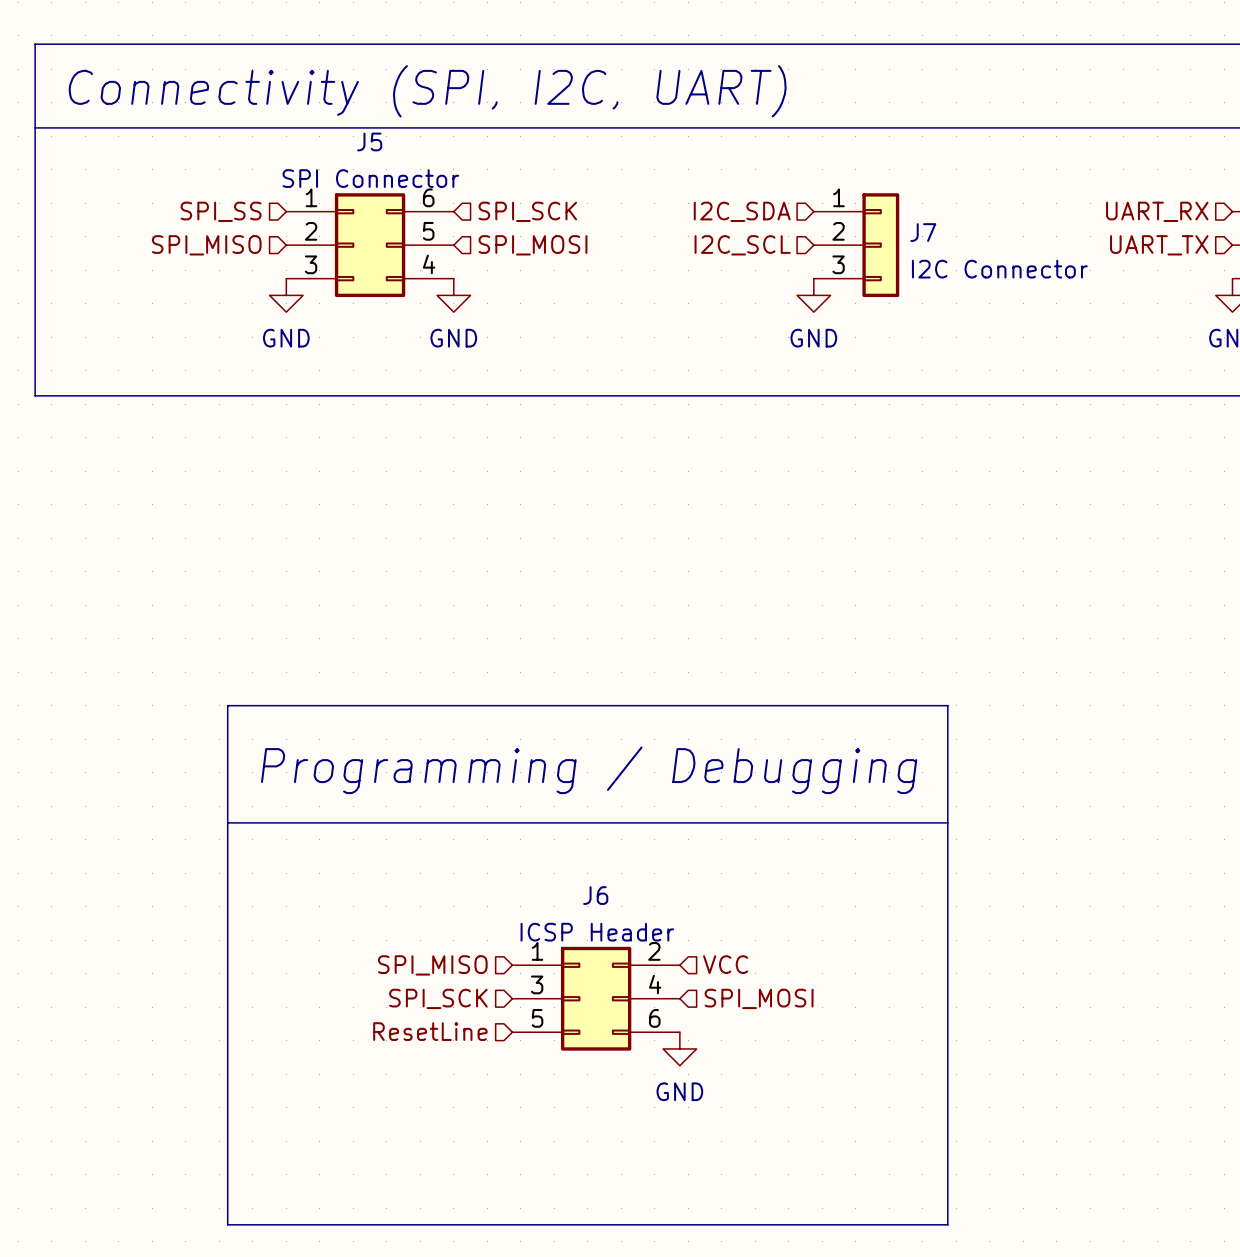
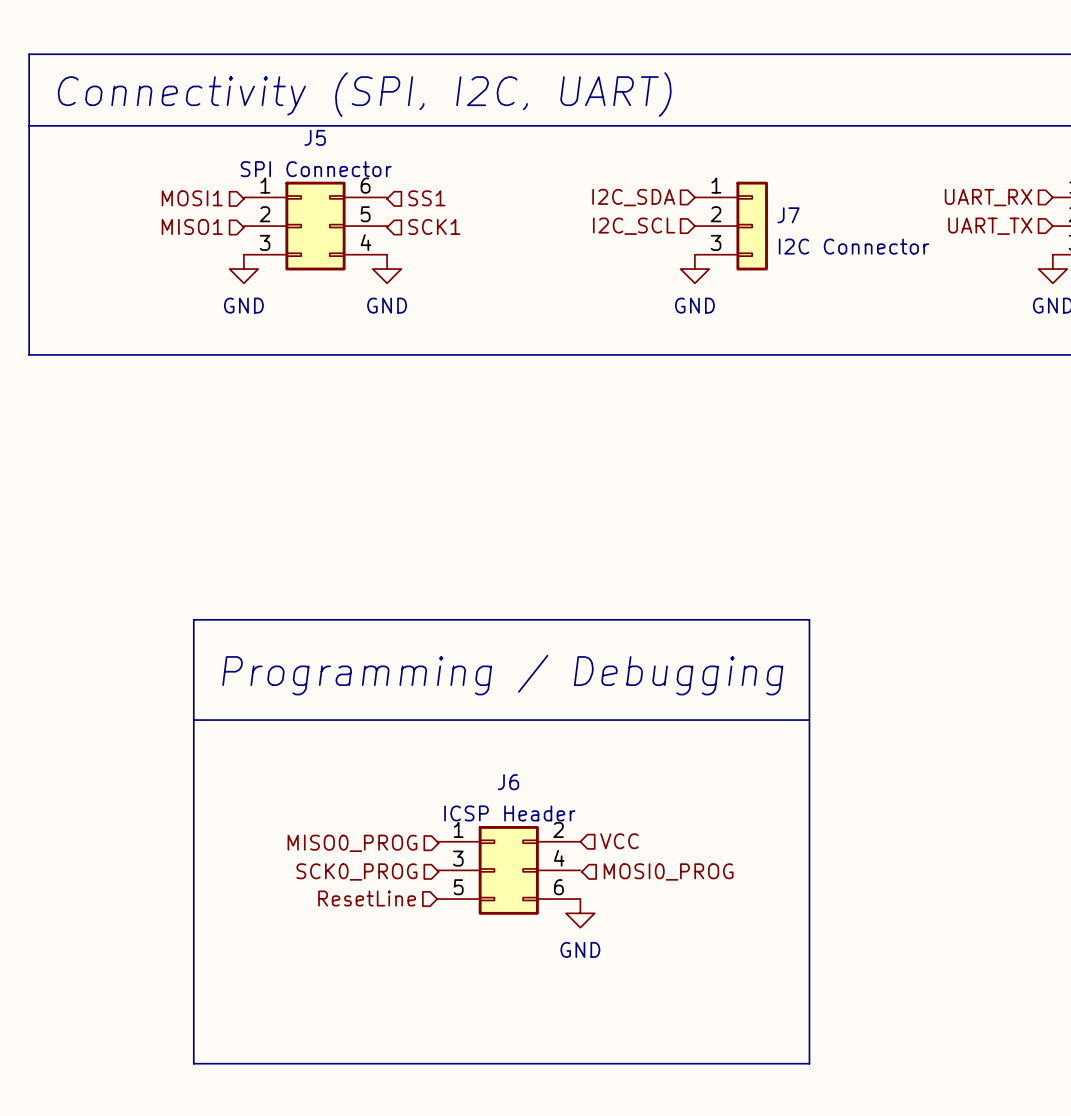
hierarchical label: SPI_SS (221, 211) -> MOSI1 (192, 198)
hierarchical label: SPI_SCK (527, 211) -> SS1 (426, 198)
hierarchical label: SPI_MISO (206, 245) -> MISO1 (192, 226)
hierarchical label: SPI_MOSI (533, 245) -> SCK1 (434, 226)
hierarchical label: SPI_MISO (432, 965) -> MISO0_PROG (352, 843)
hierarchical label: SPI_SCK (438, 998) -> SCK0_PROG (356, 871)
hierarchical label: SPI_MOSI (759, 998) -> MOSI0_PROG (668, 871)

